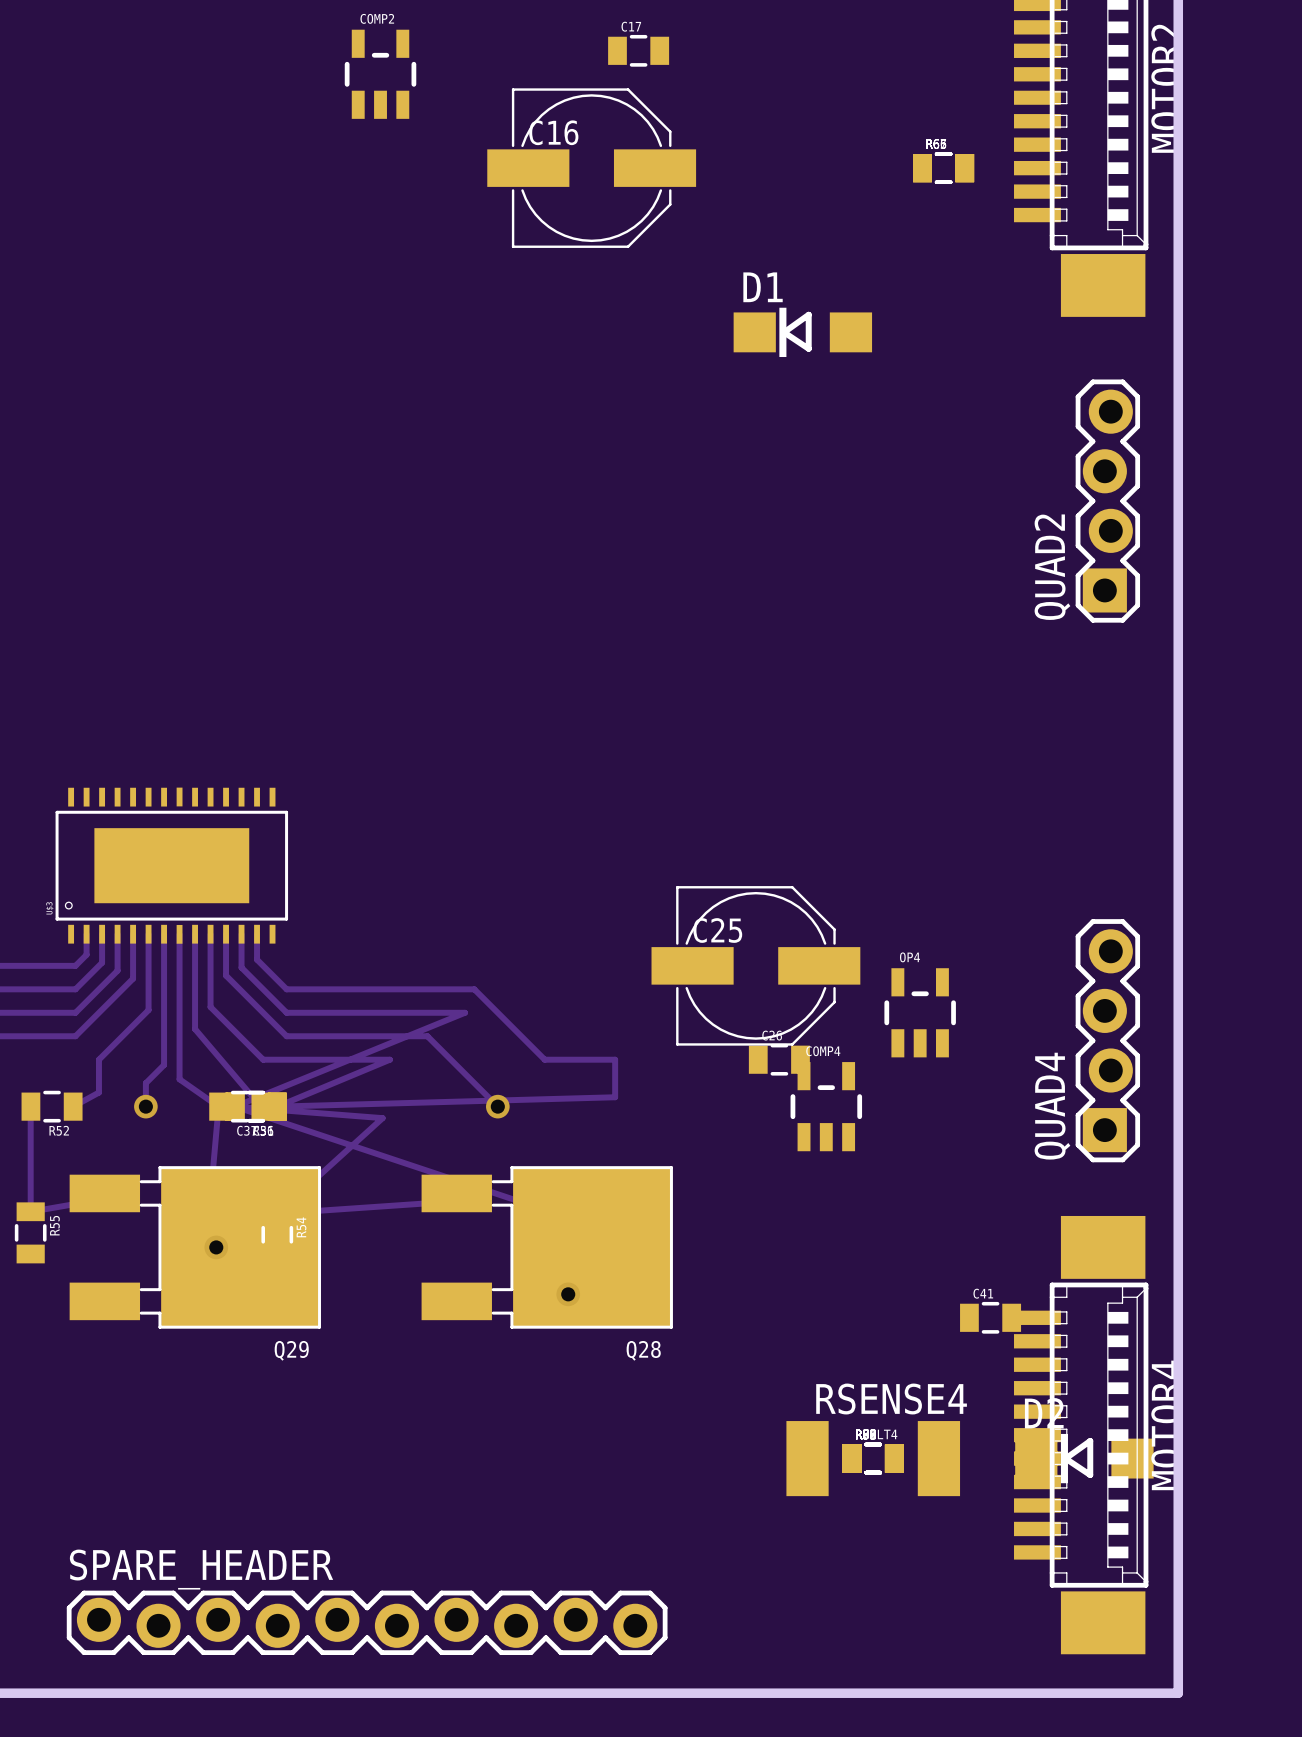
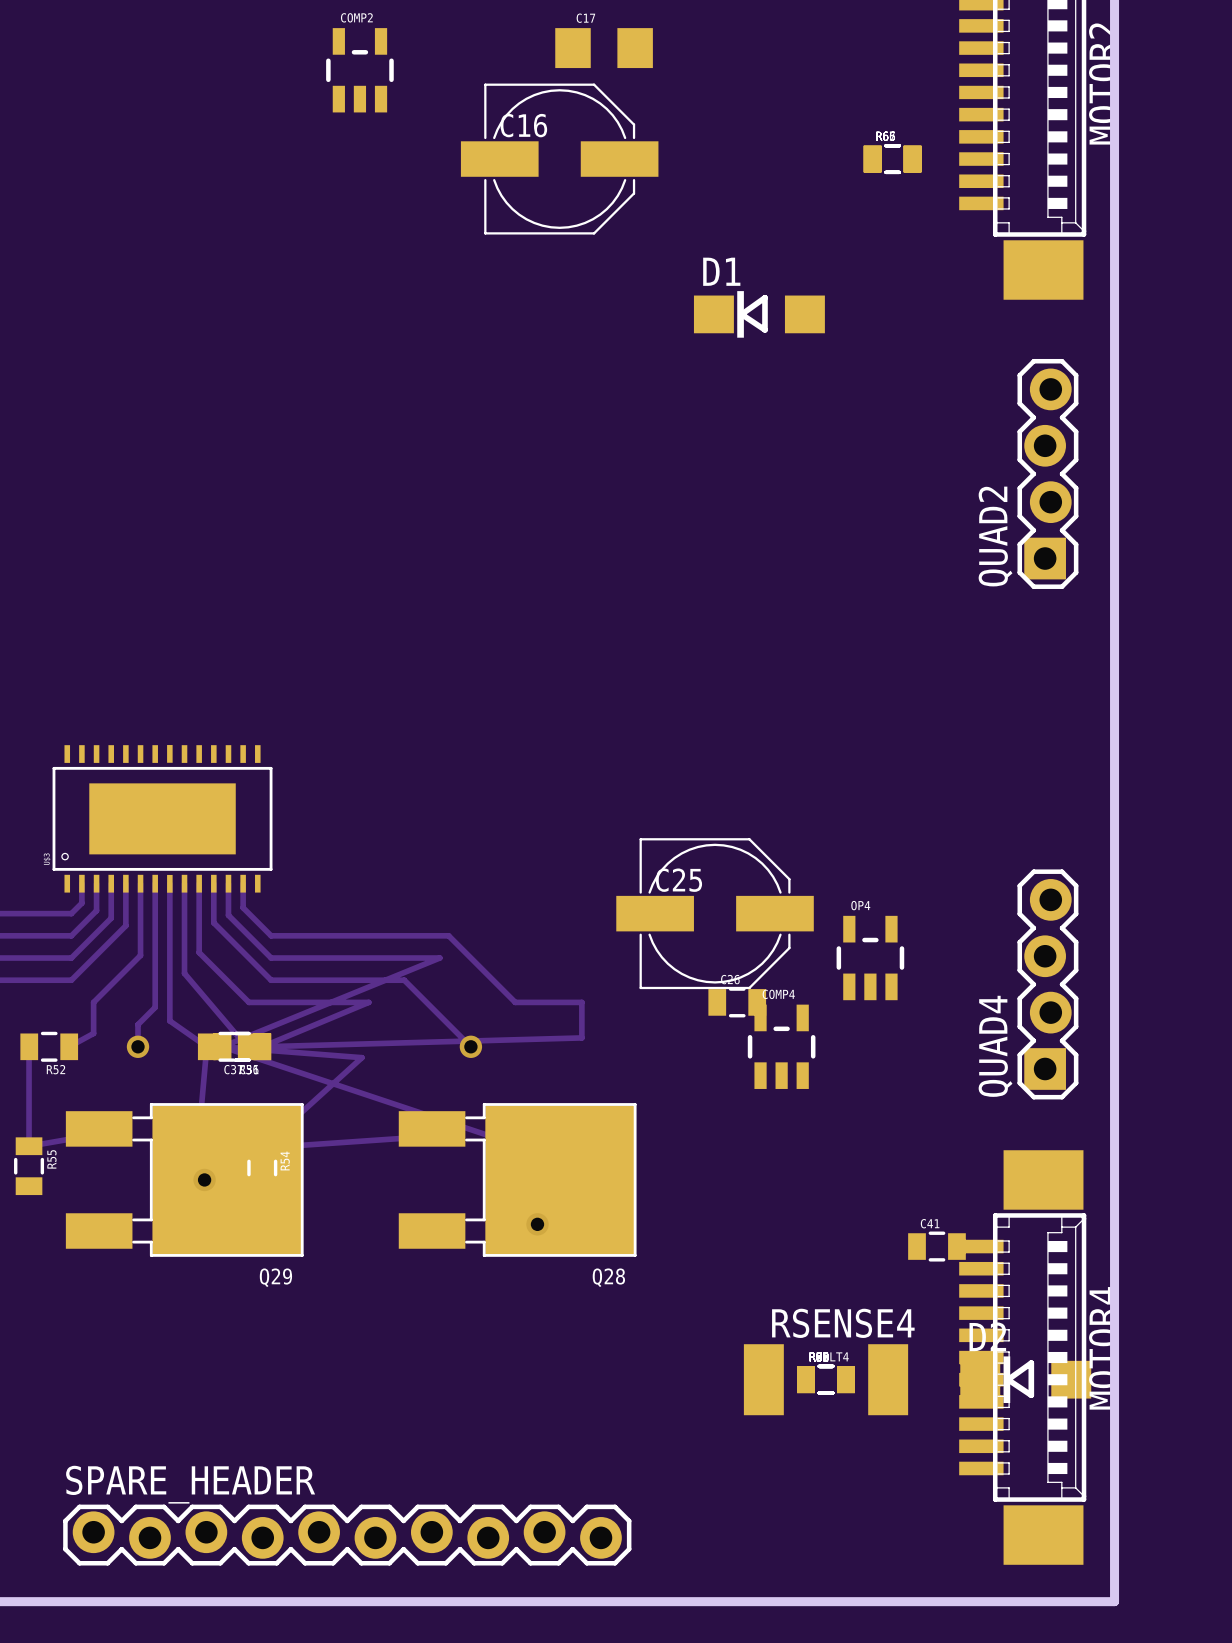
C17 footprint: [608, 34, 670, 67] -> [555, 28, 653, 69]

